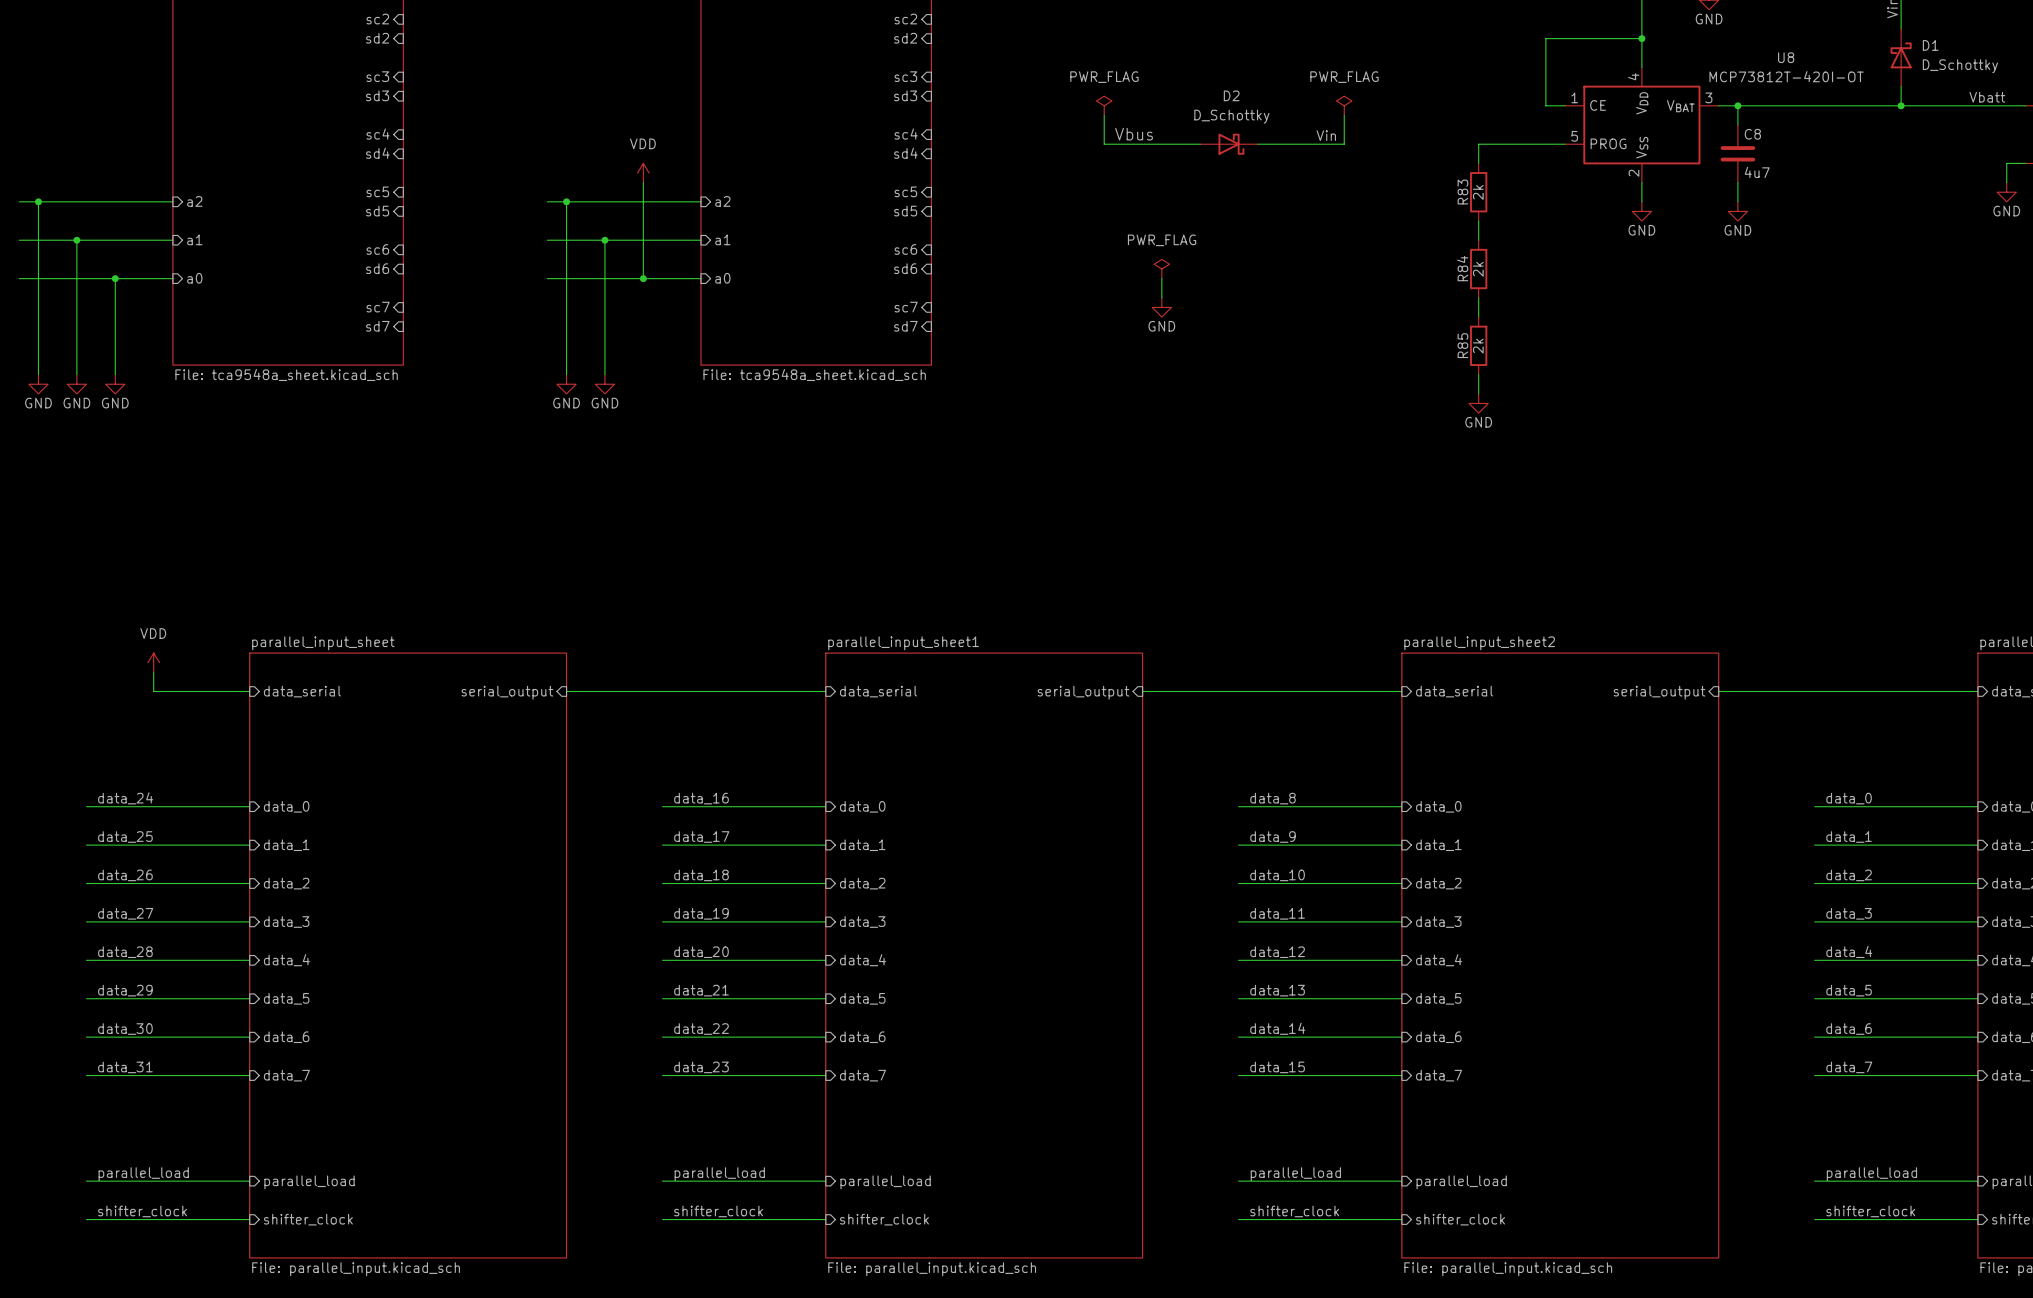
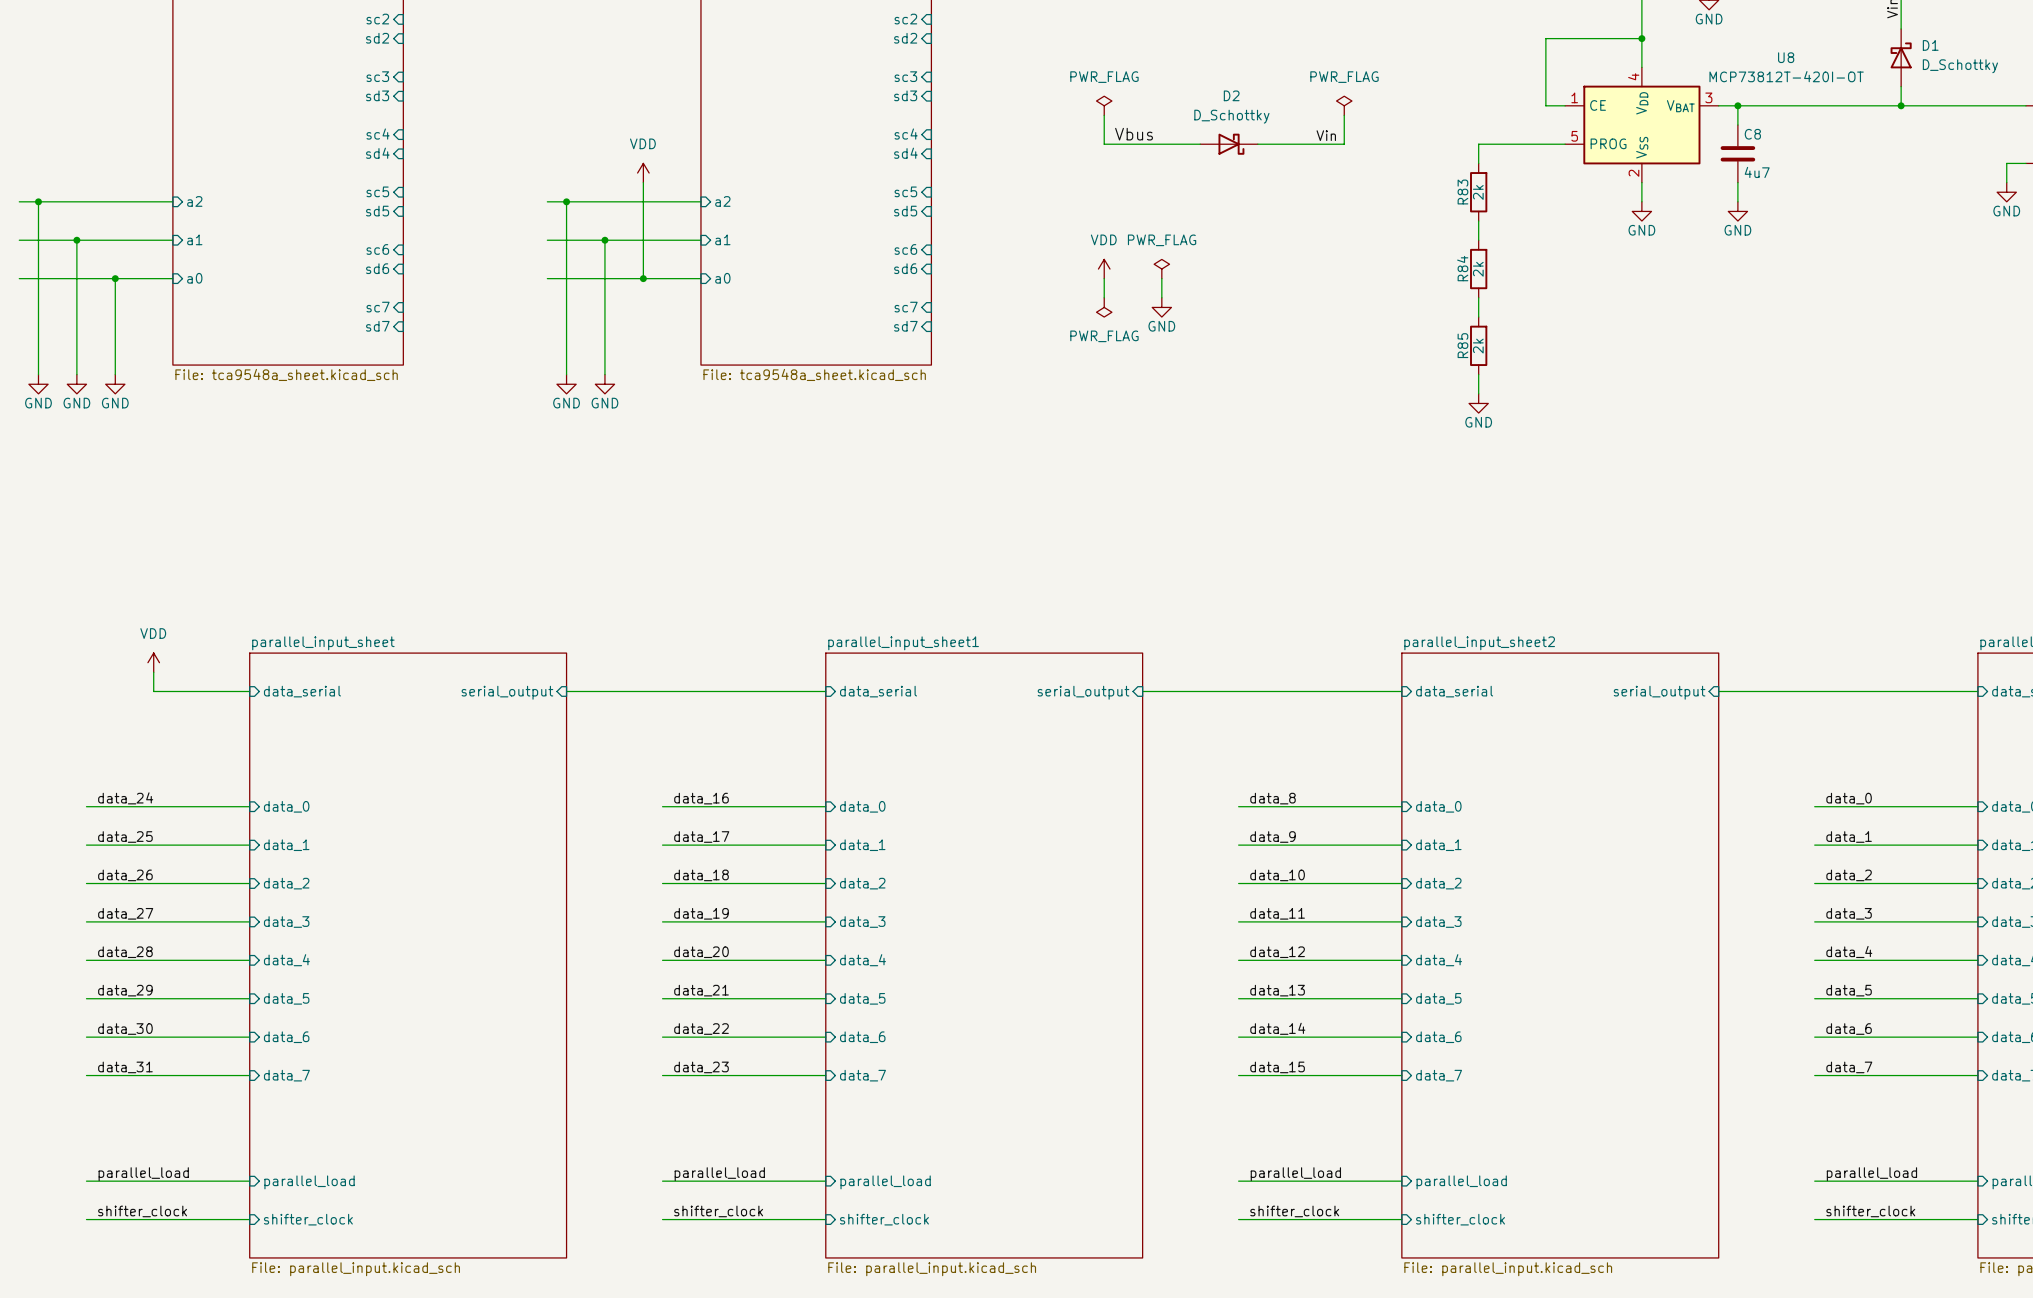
label: Vbatt (1987, 97) -> none
power symbol: none -> VDD (1104, 269)
wire: none -> (1104, 278) (1104, 297)
power symbol: none -> PWR_FLAG (1104, 307)

